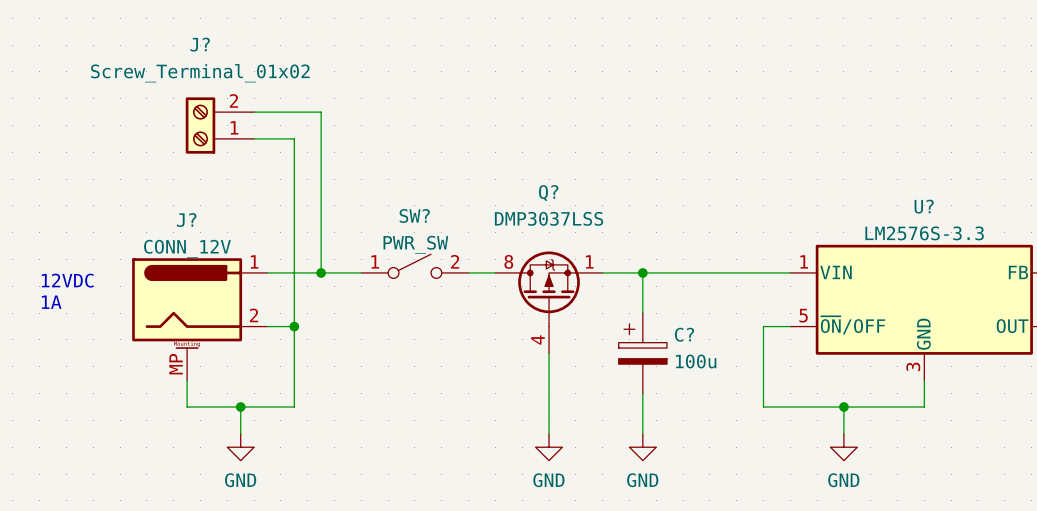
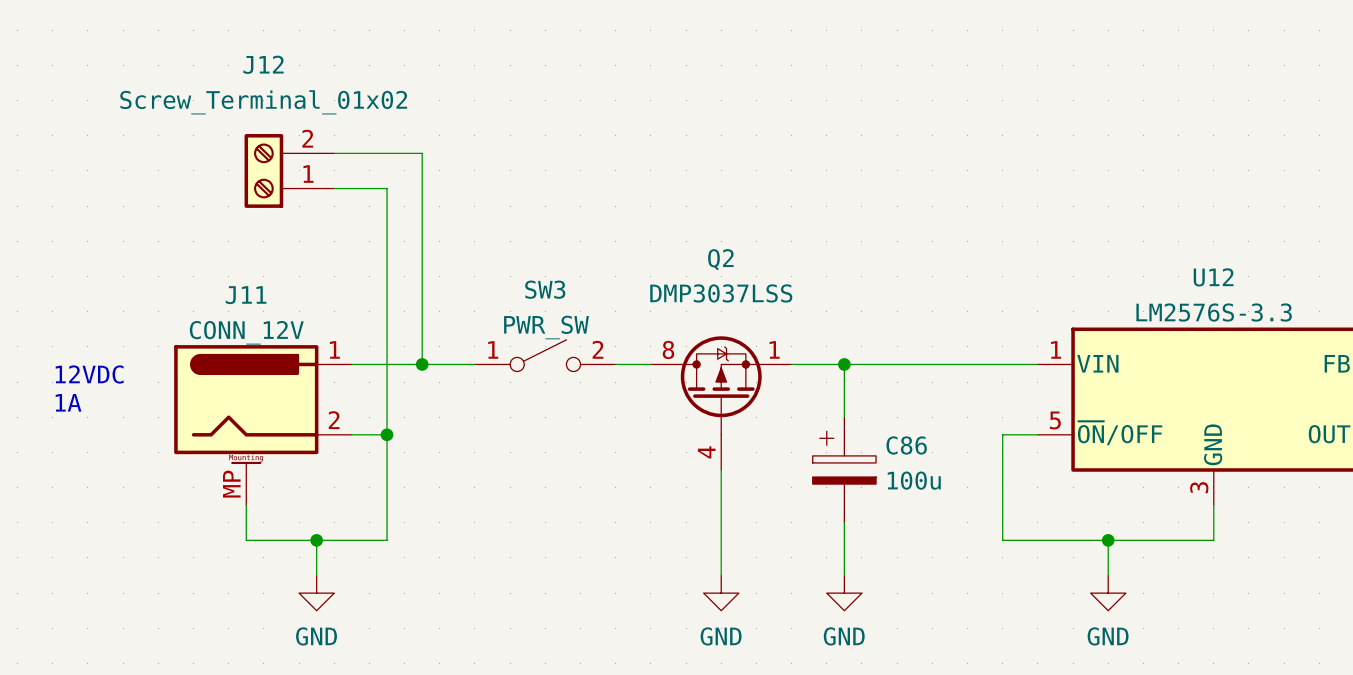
J? name: J? (200, 44) -> J12 (263, 64)
Q? name: Q? (548, 193) -> Q2 (720, 259)
U? name: U? (924, 206) -> U12 (1213, 277)
SW? name: SW? (414, 216) -> SW3 (545, 289)
J? name: J? (186, 220) -> J11 (246, 295)
C? name: C? (684, 334) -> C86 (906, 445)

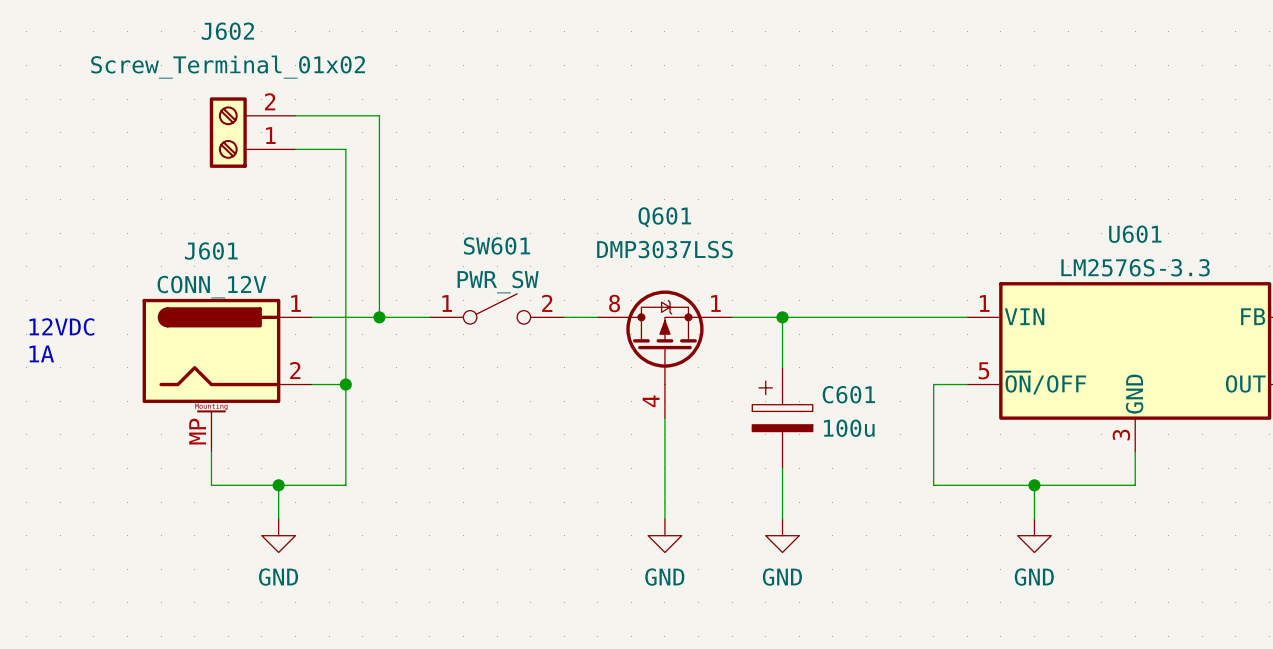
J12 name: J12 (263, 64) -> J602 (227, 31)
Q2 name: Q2 (720, 259) -> Q601 (664, 217)
U12 name: U12 (1213, 277) -> U601 (1135, 234)
SW3 name: SW3 (545, 289) -> SW601 (497, 245)
J11 name: J11 (246, 295) -> J601 (211, 251)
C86 name: C86 (906, 445) -> C601 (848, 394)

